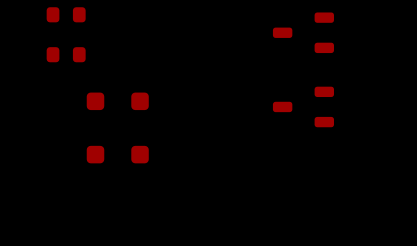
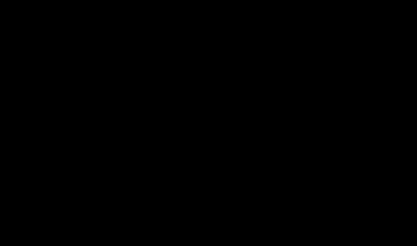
part: (66, 14) -> none
part: (303, 32) -> none
part: (66, 54) -> none
part: (117, 101) -> none
part: (303, 106) -> none
part: (117, 154) -> none

